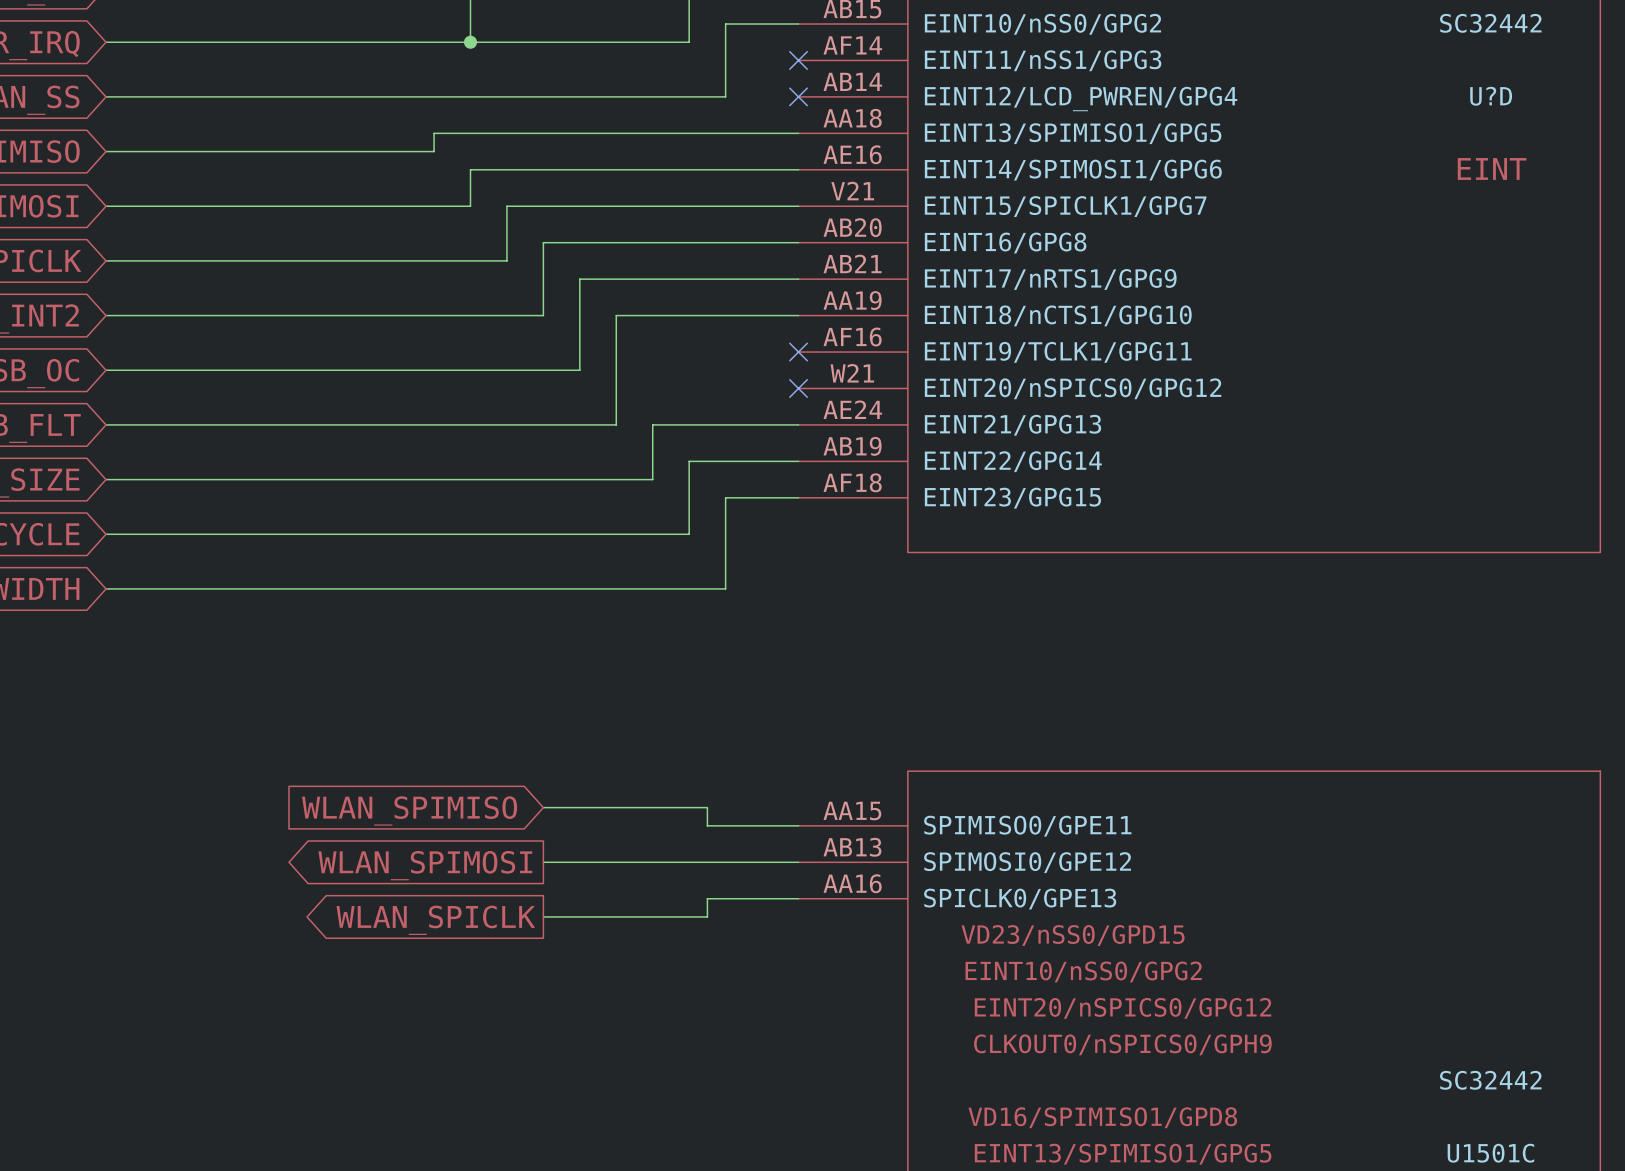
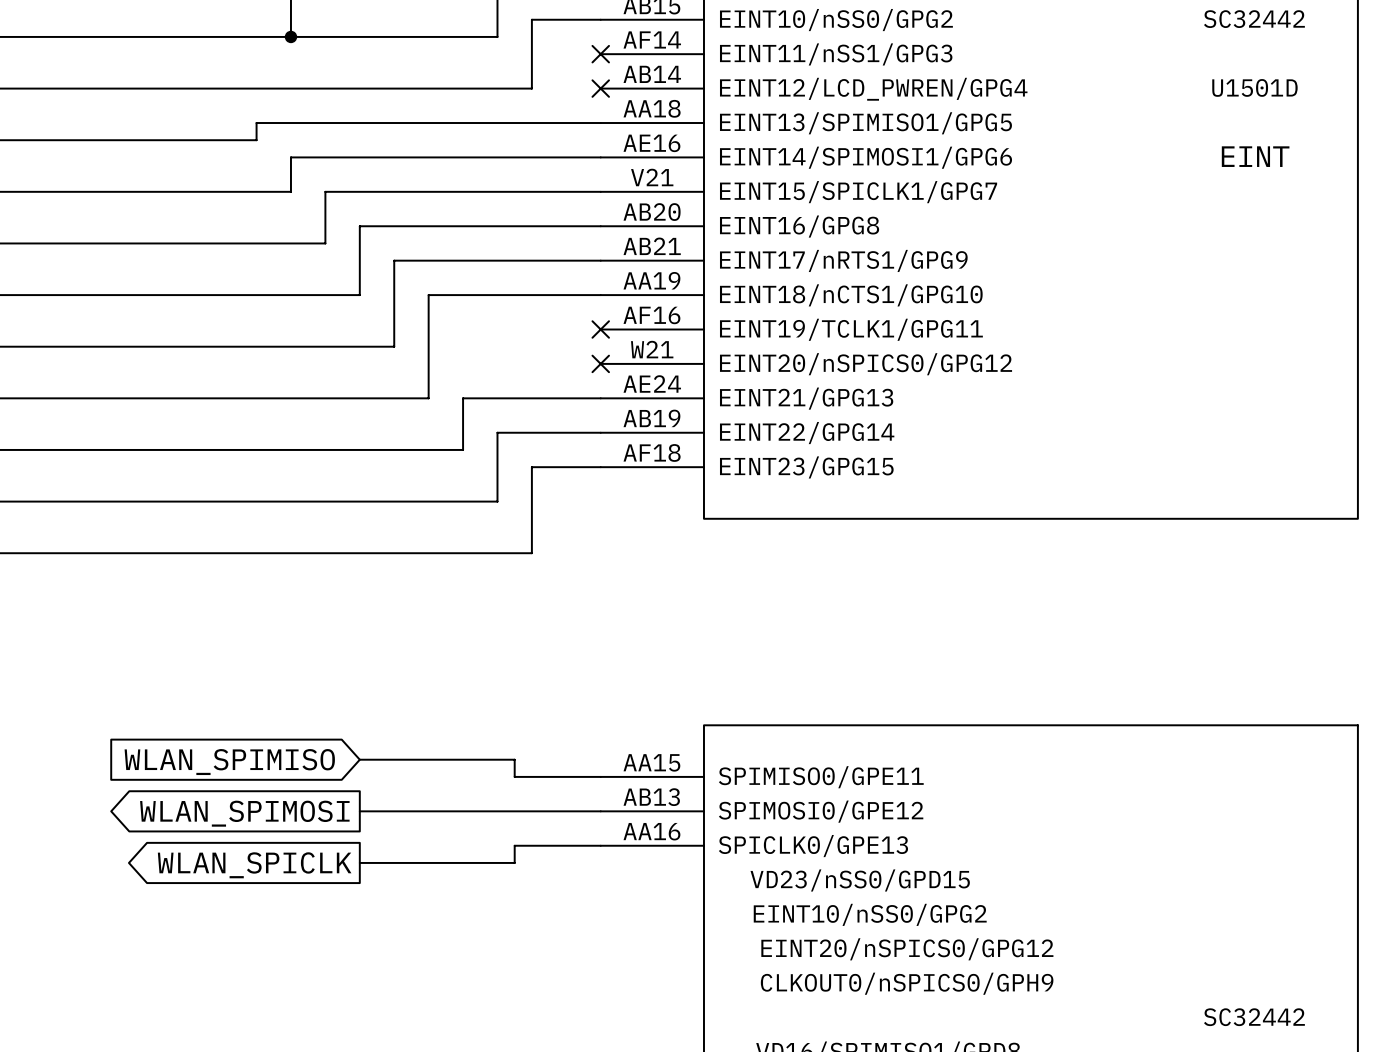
U?D name: U?D (1491, 96) -> U1501D (1254, 87)

